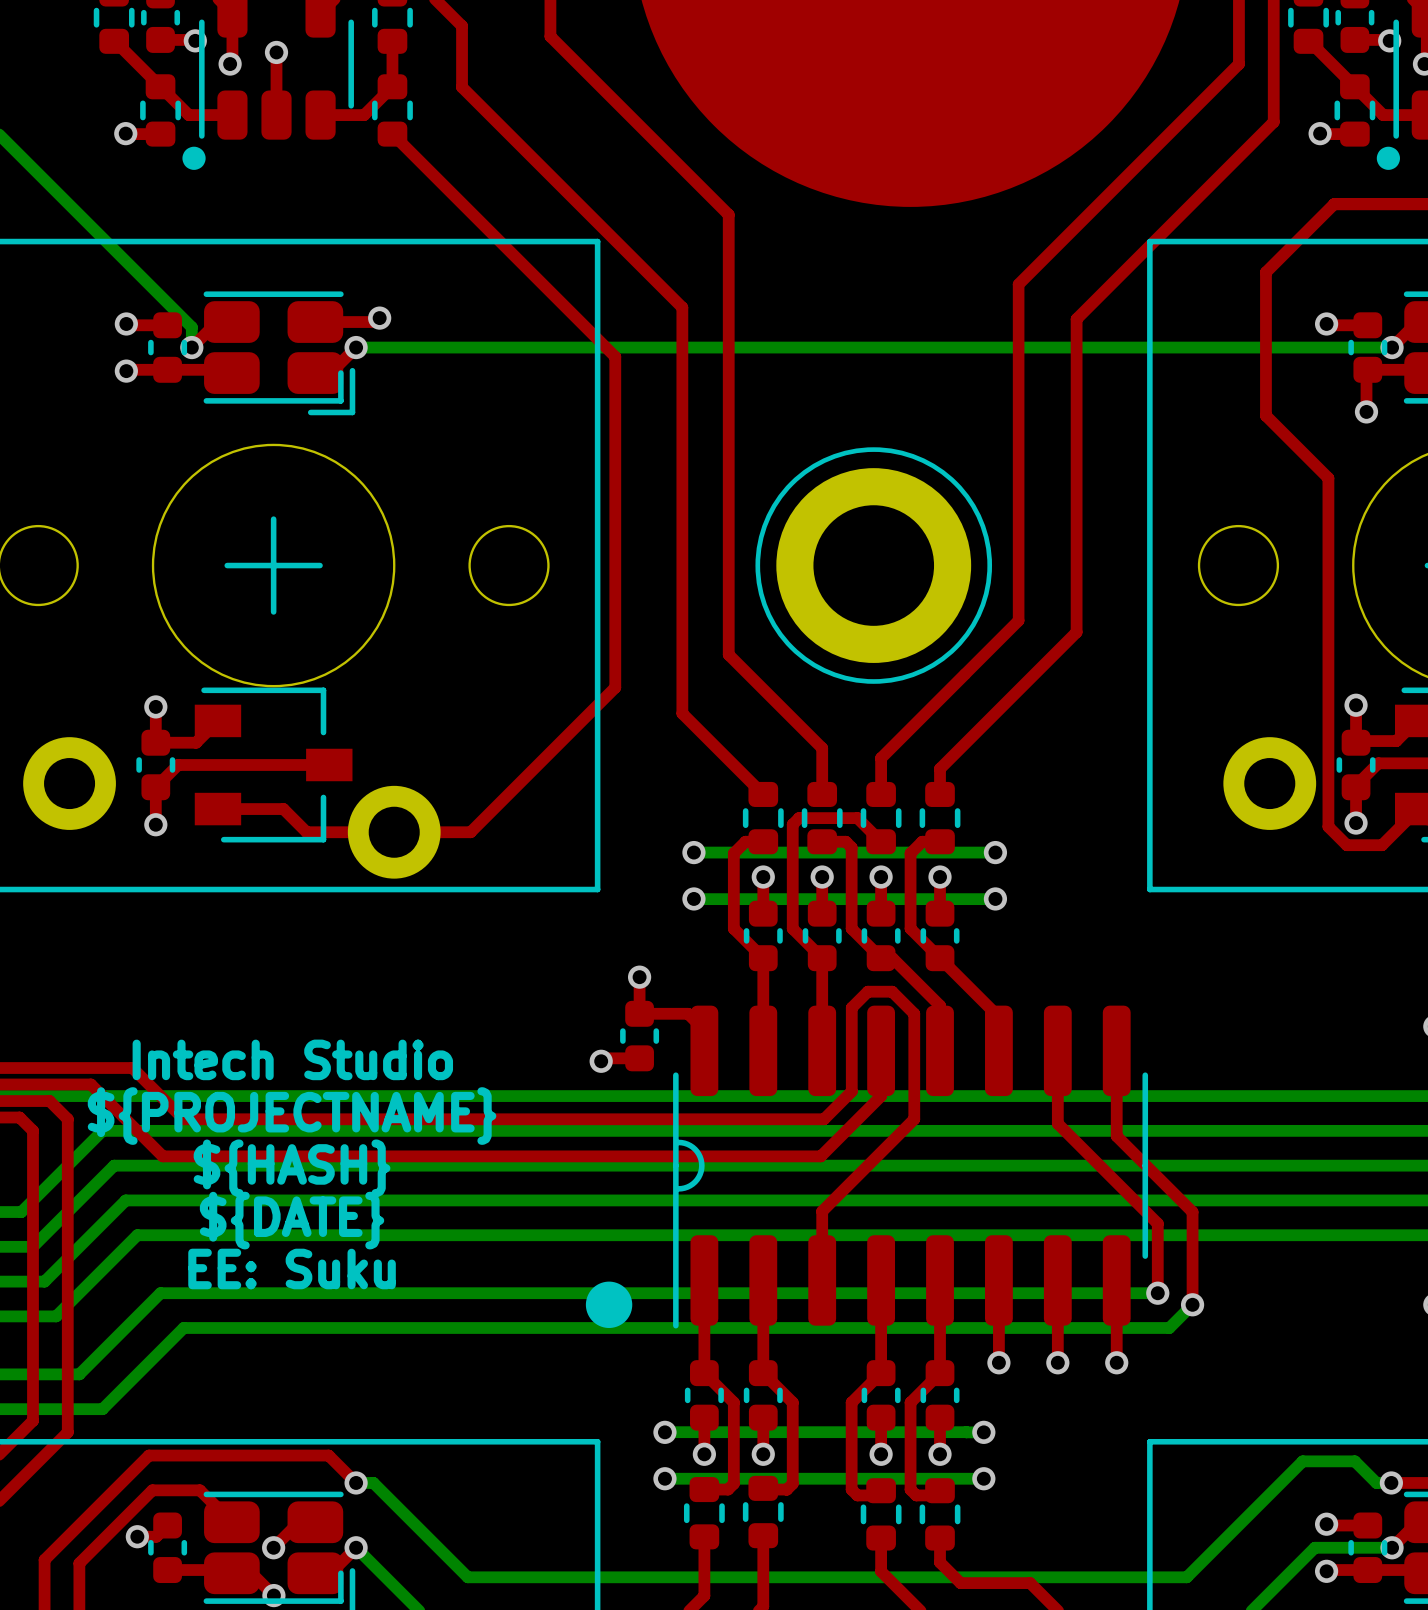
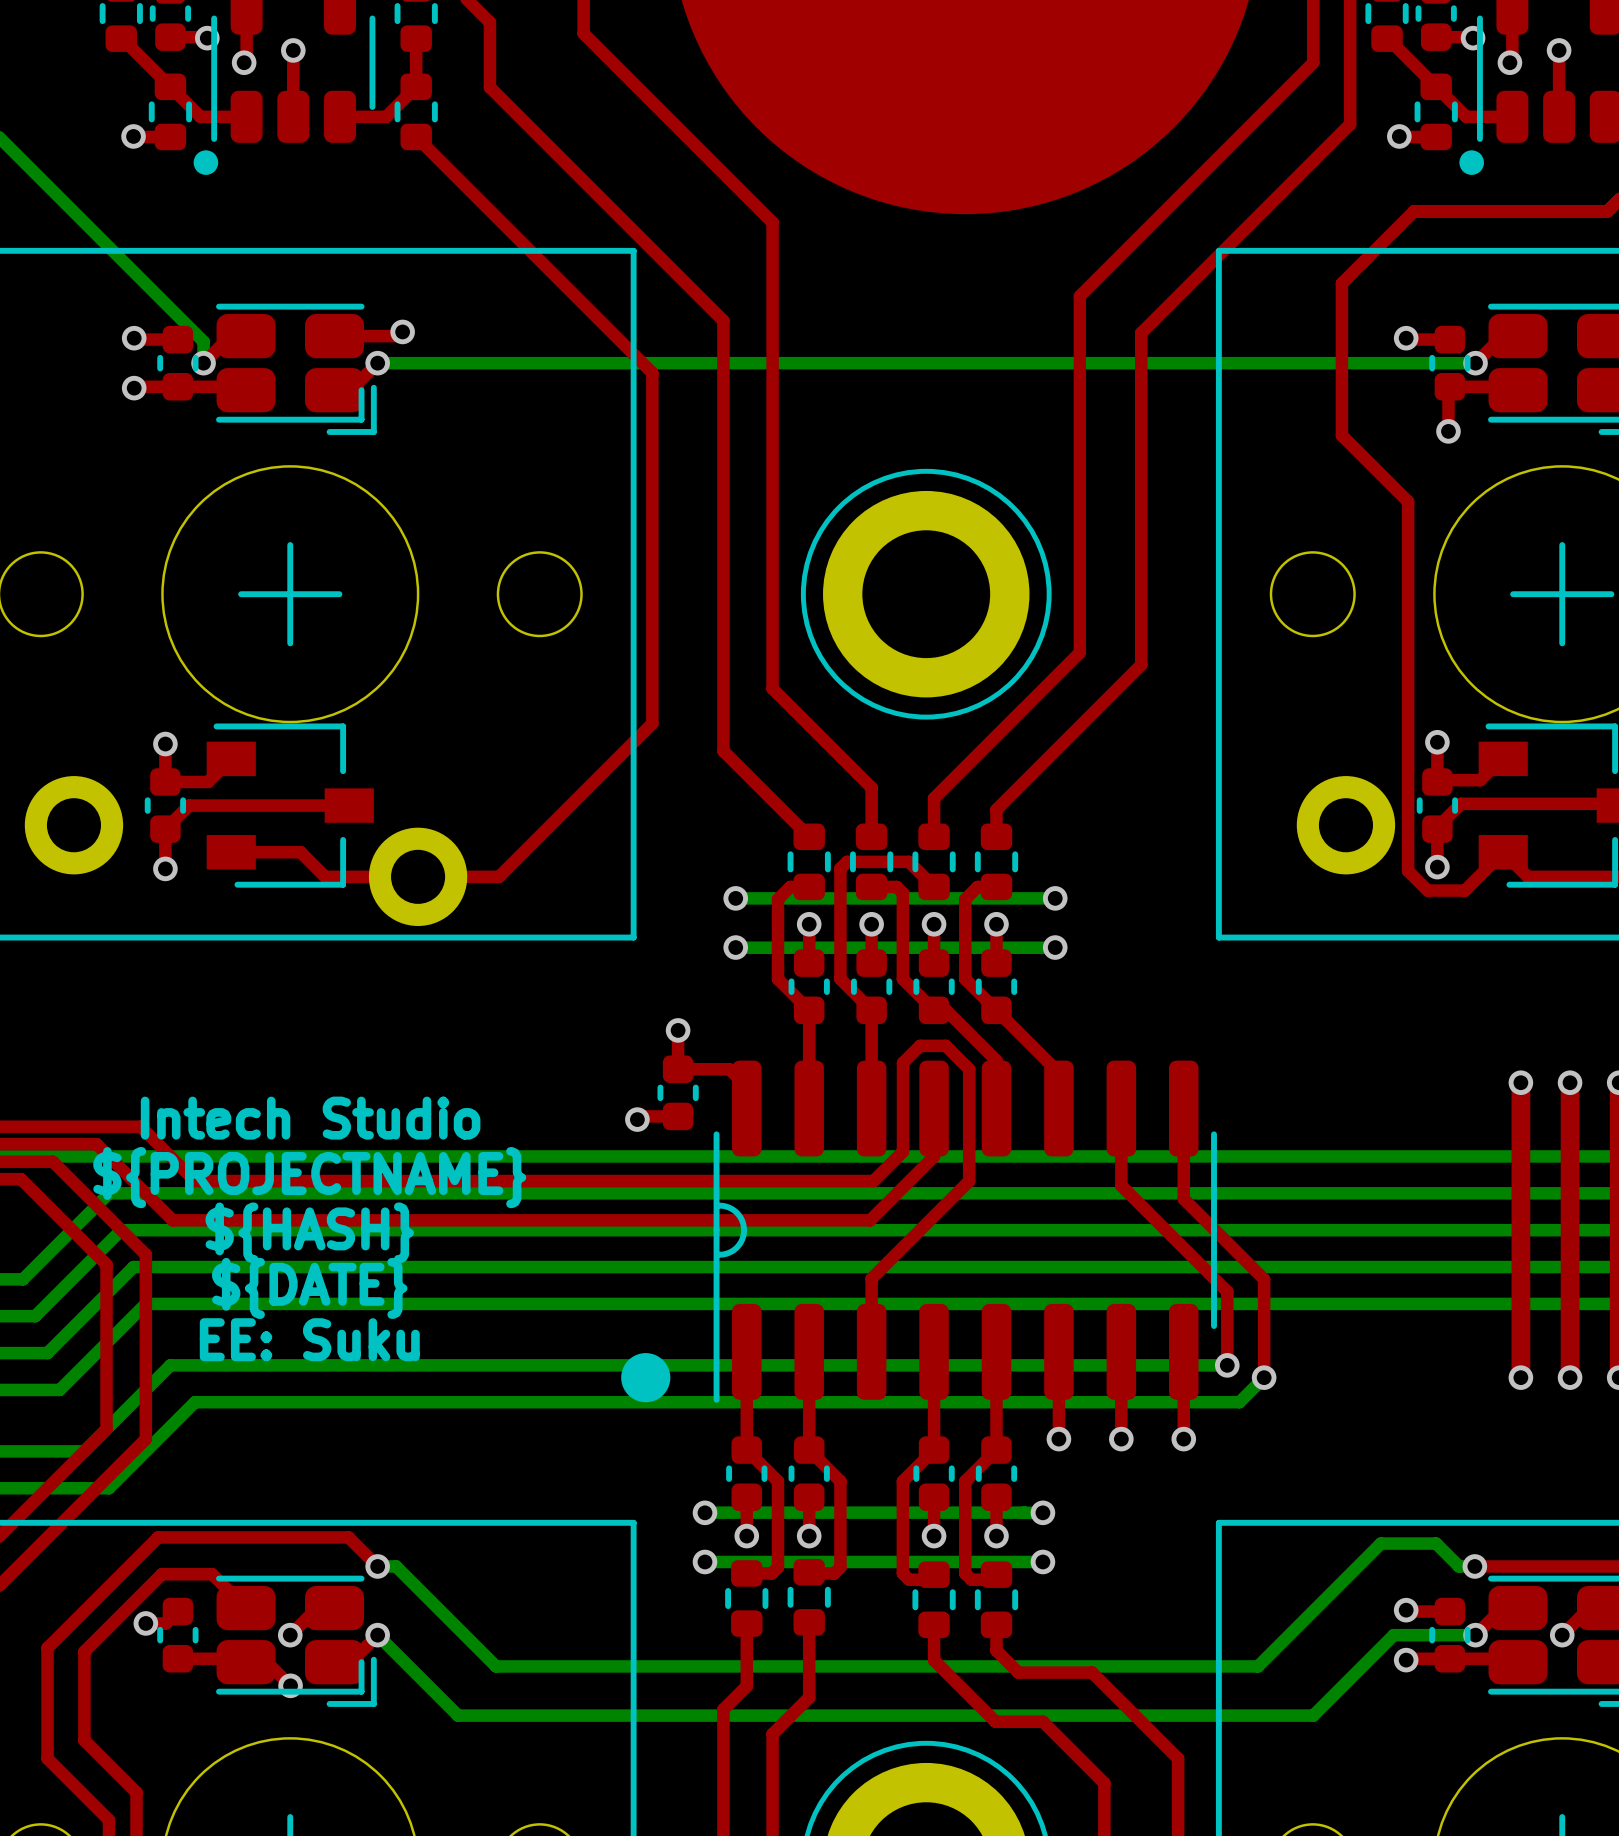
top track: (67, 1119) (67, 1432) -> (72, 1180) (145, 1254) (145, 1439) (72, 1512)
top track: (32, 1130) (32, 1420) -> (35, 1193) (106, 1264) (106, 1429) (35, 1500)

